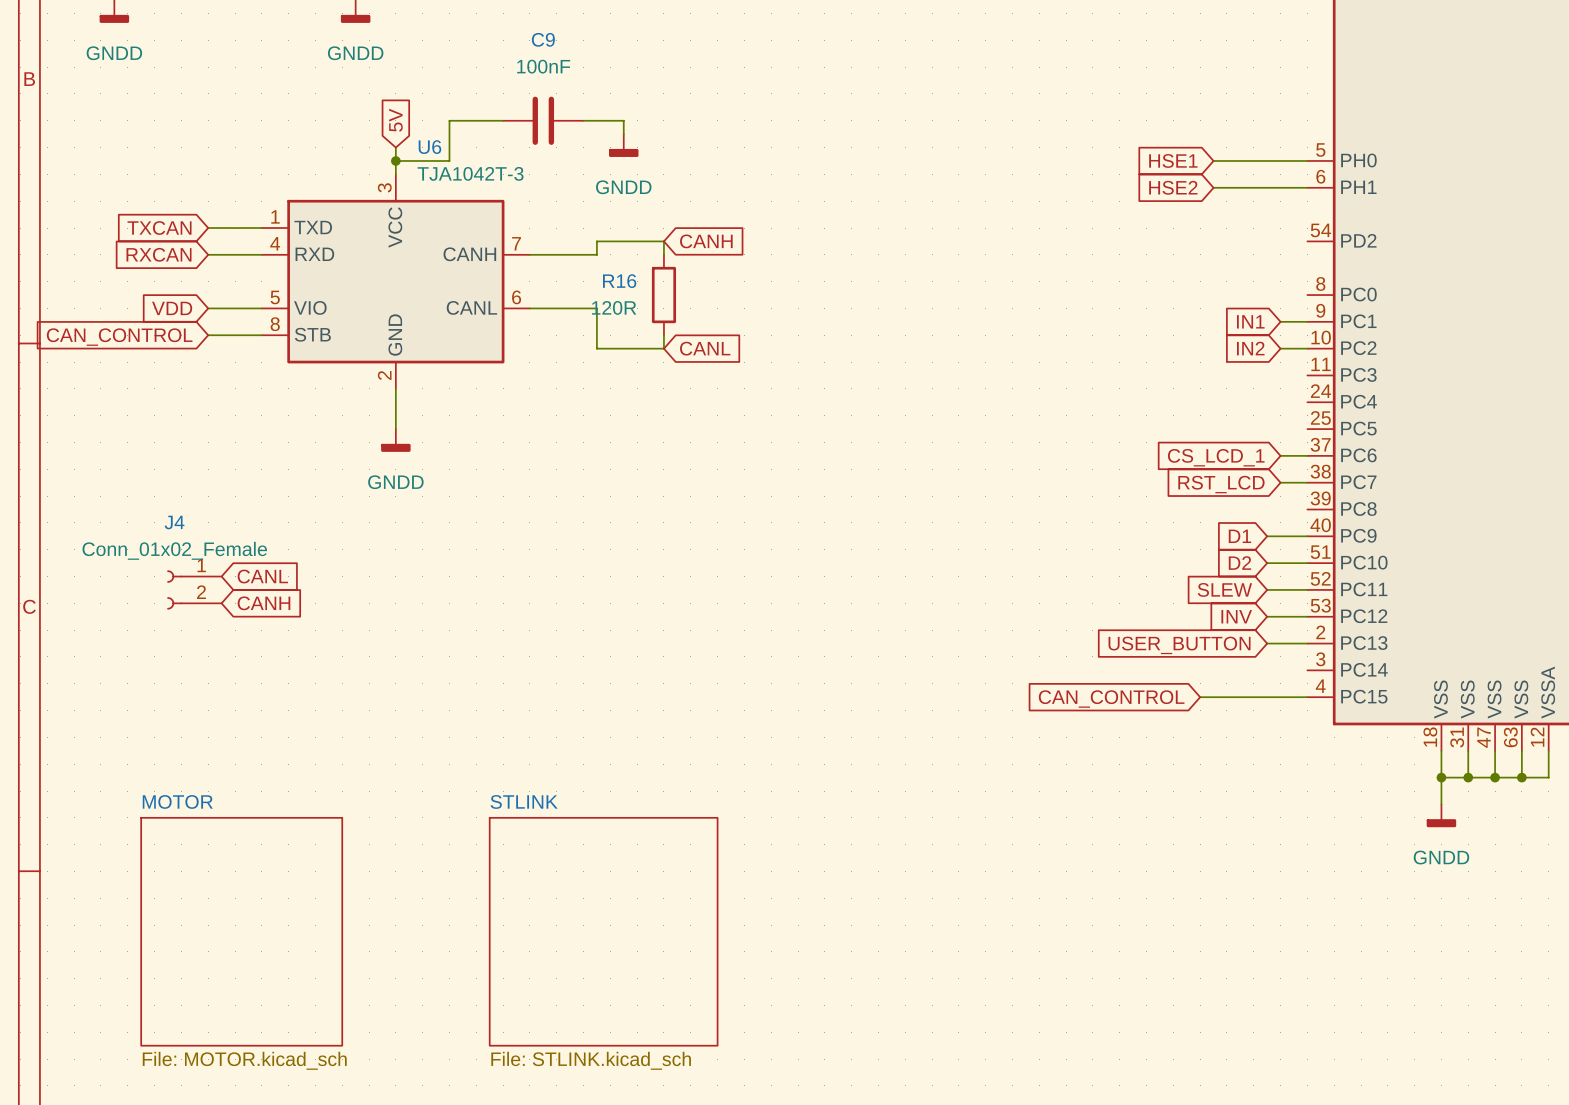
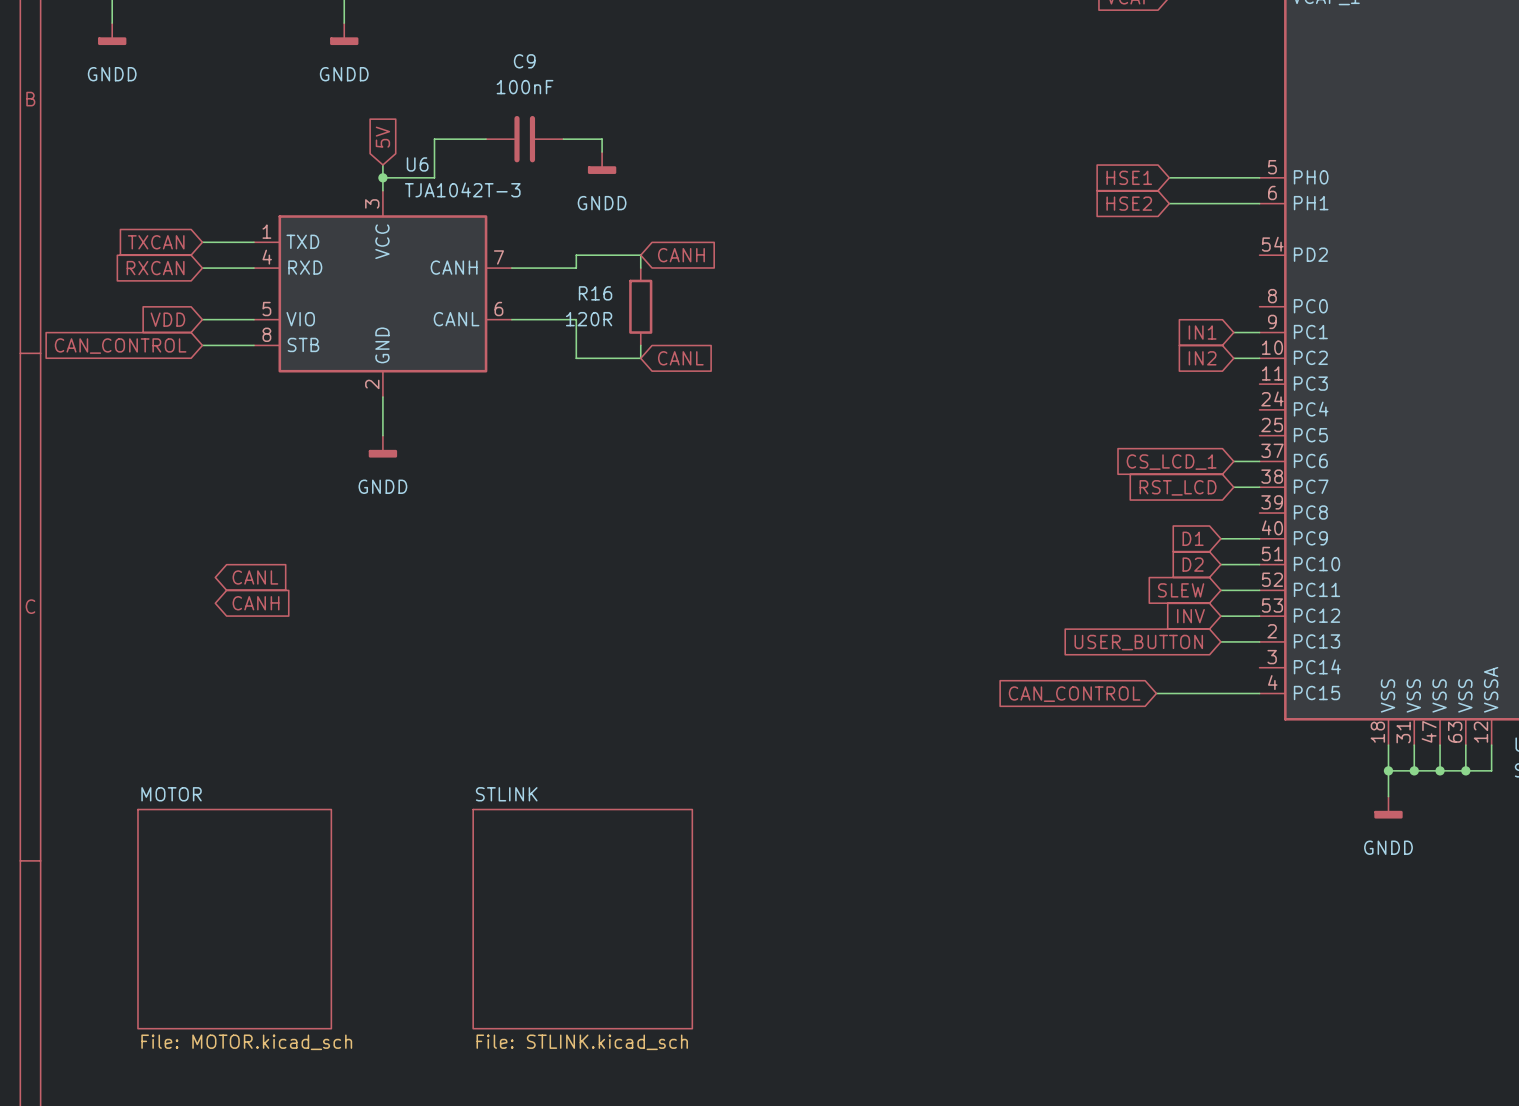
J4: Conn_01x02_Female (194, 589) -> none

